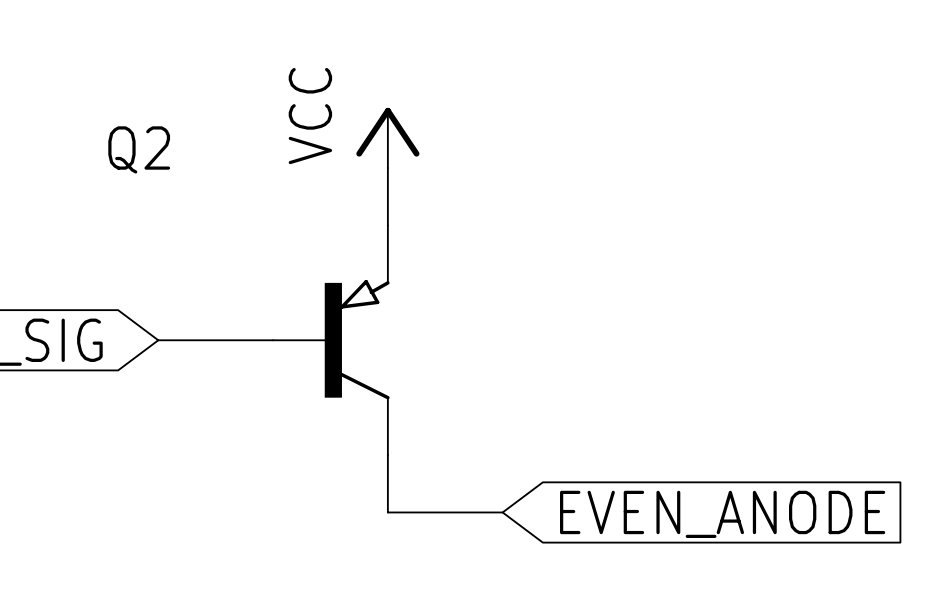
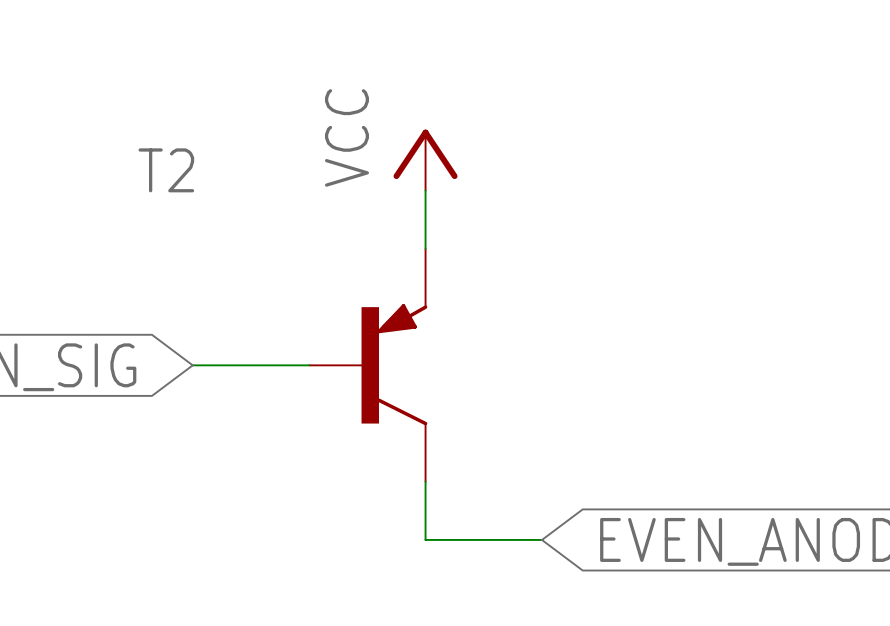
Q2: (331, 340) -> none
T2: none -> (368, 365)

